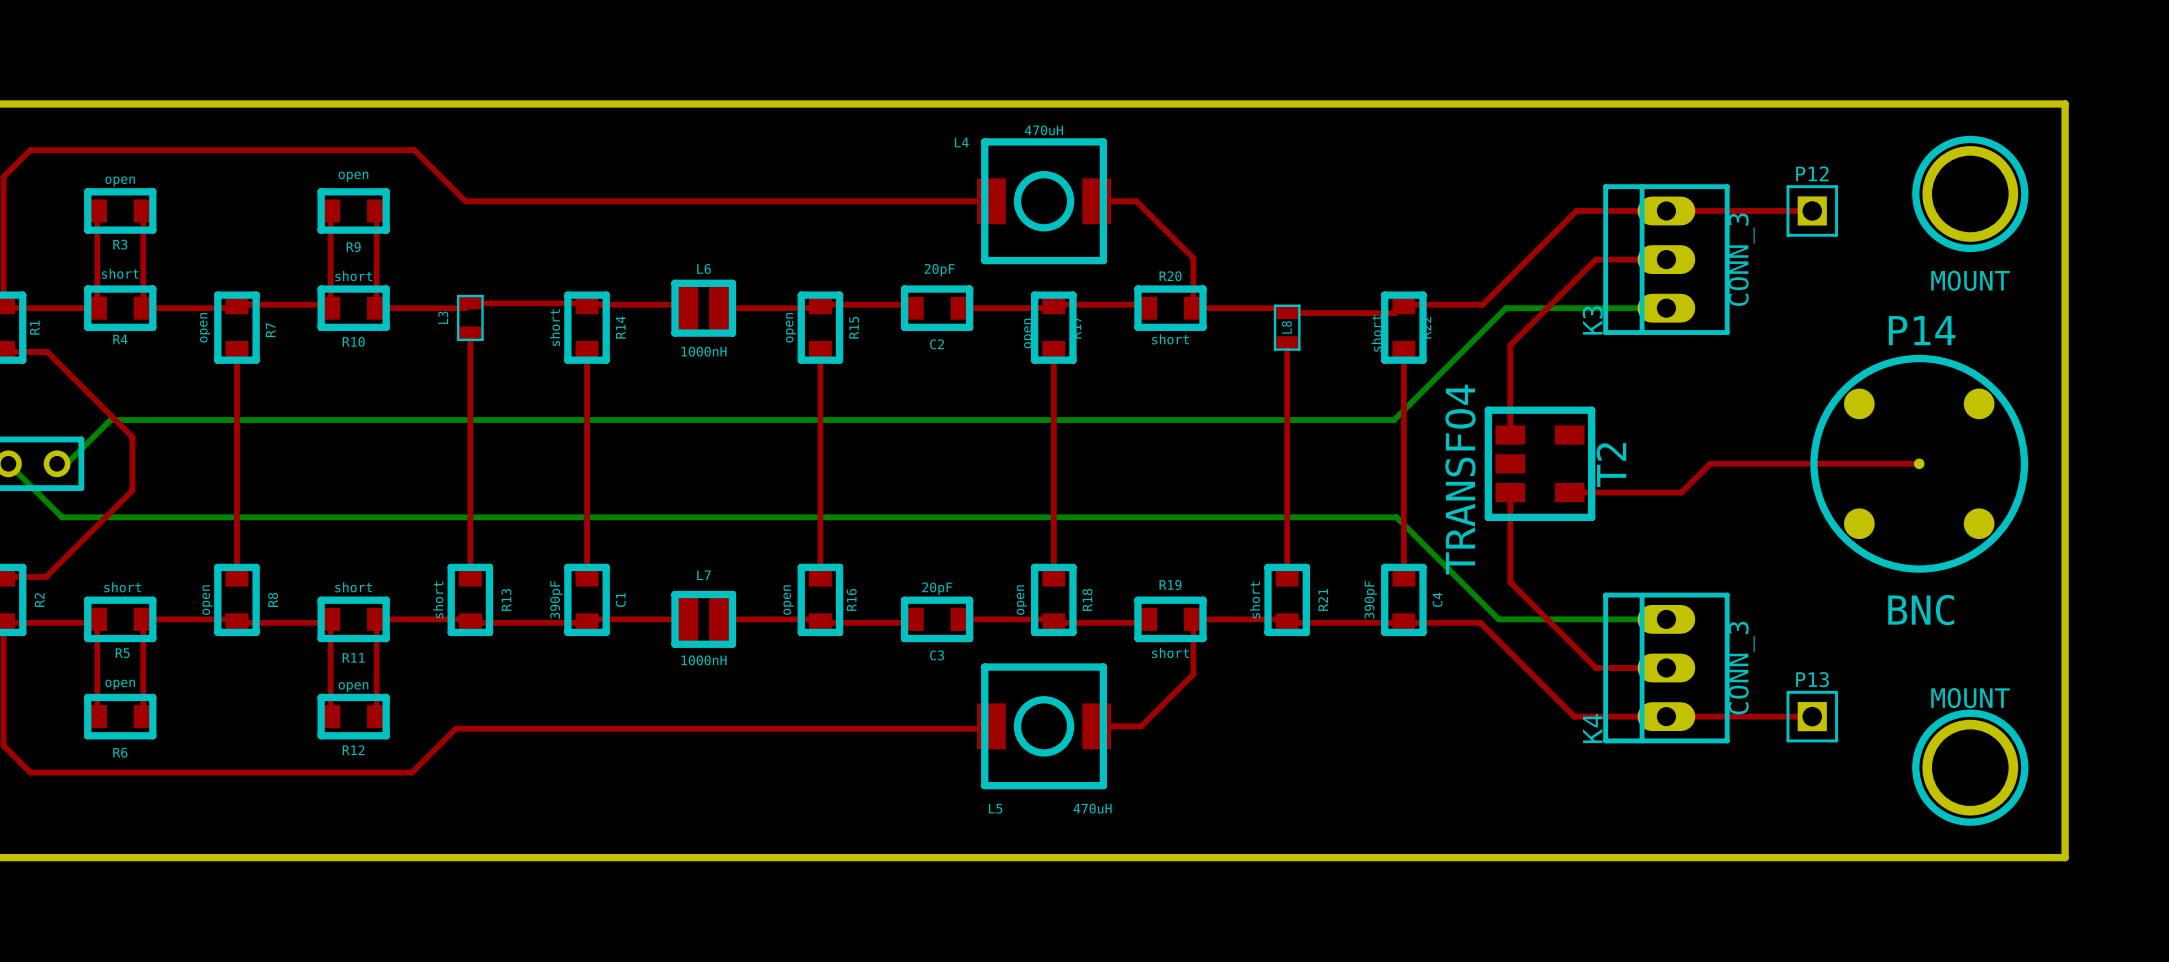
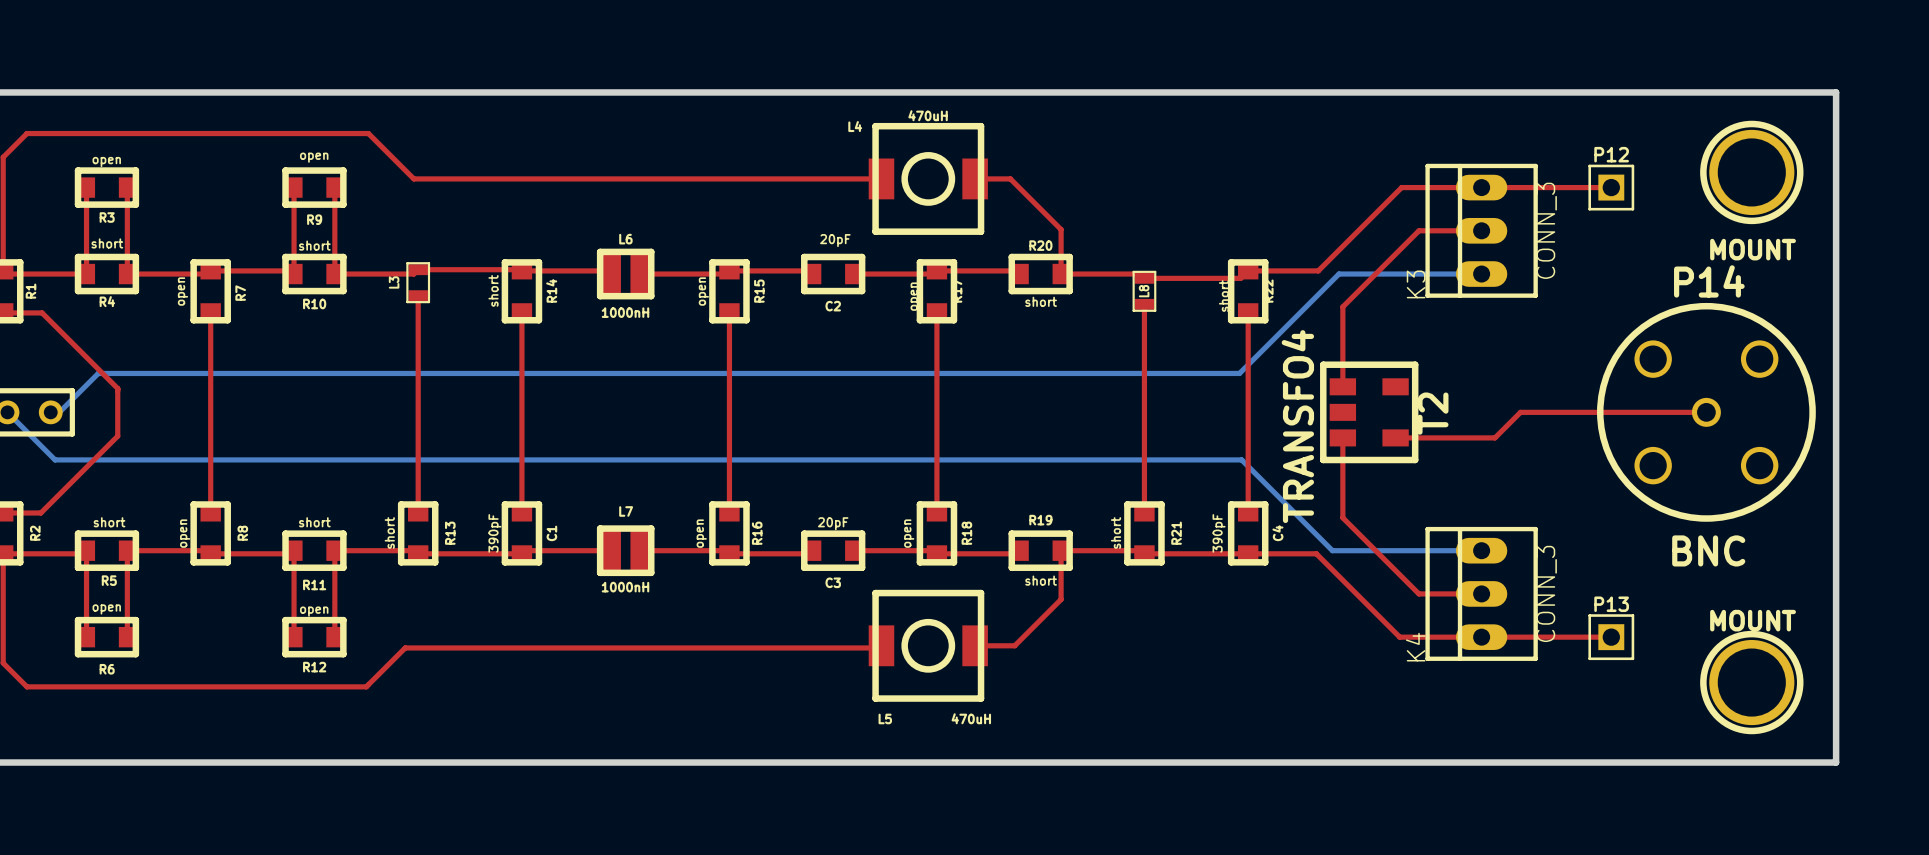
P14 footprint: [1810, 354, 2029, 573] -> [1597, 302, 1816, 522]

